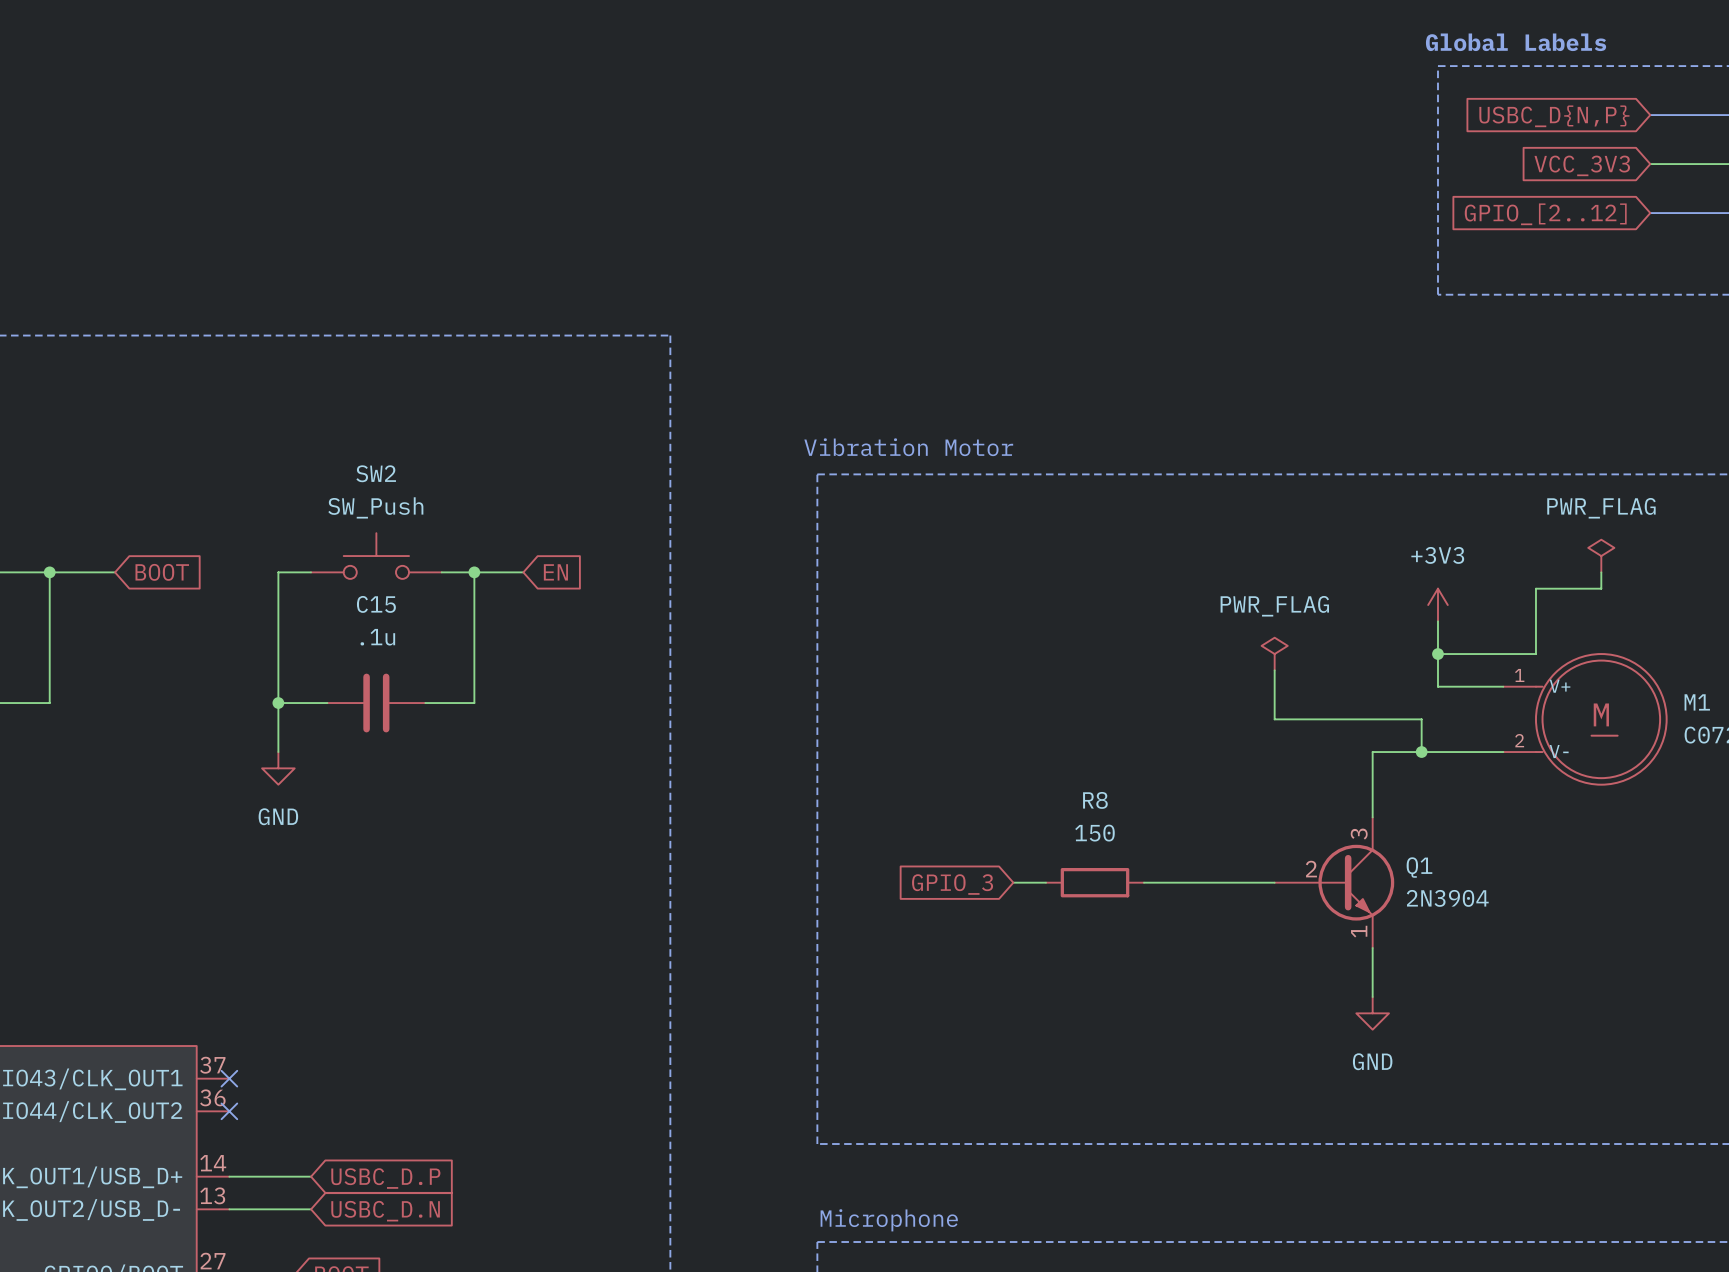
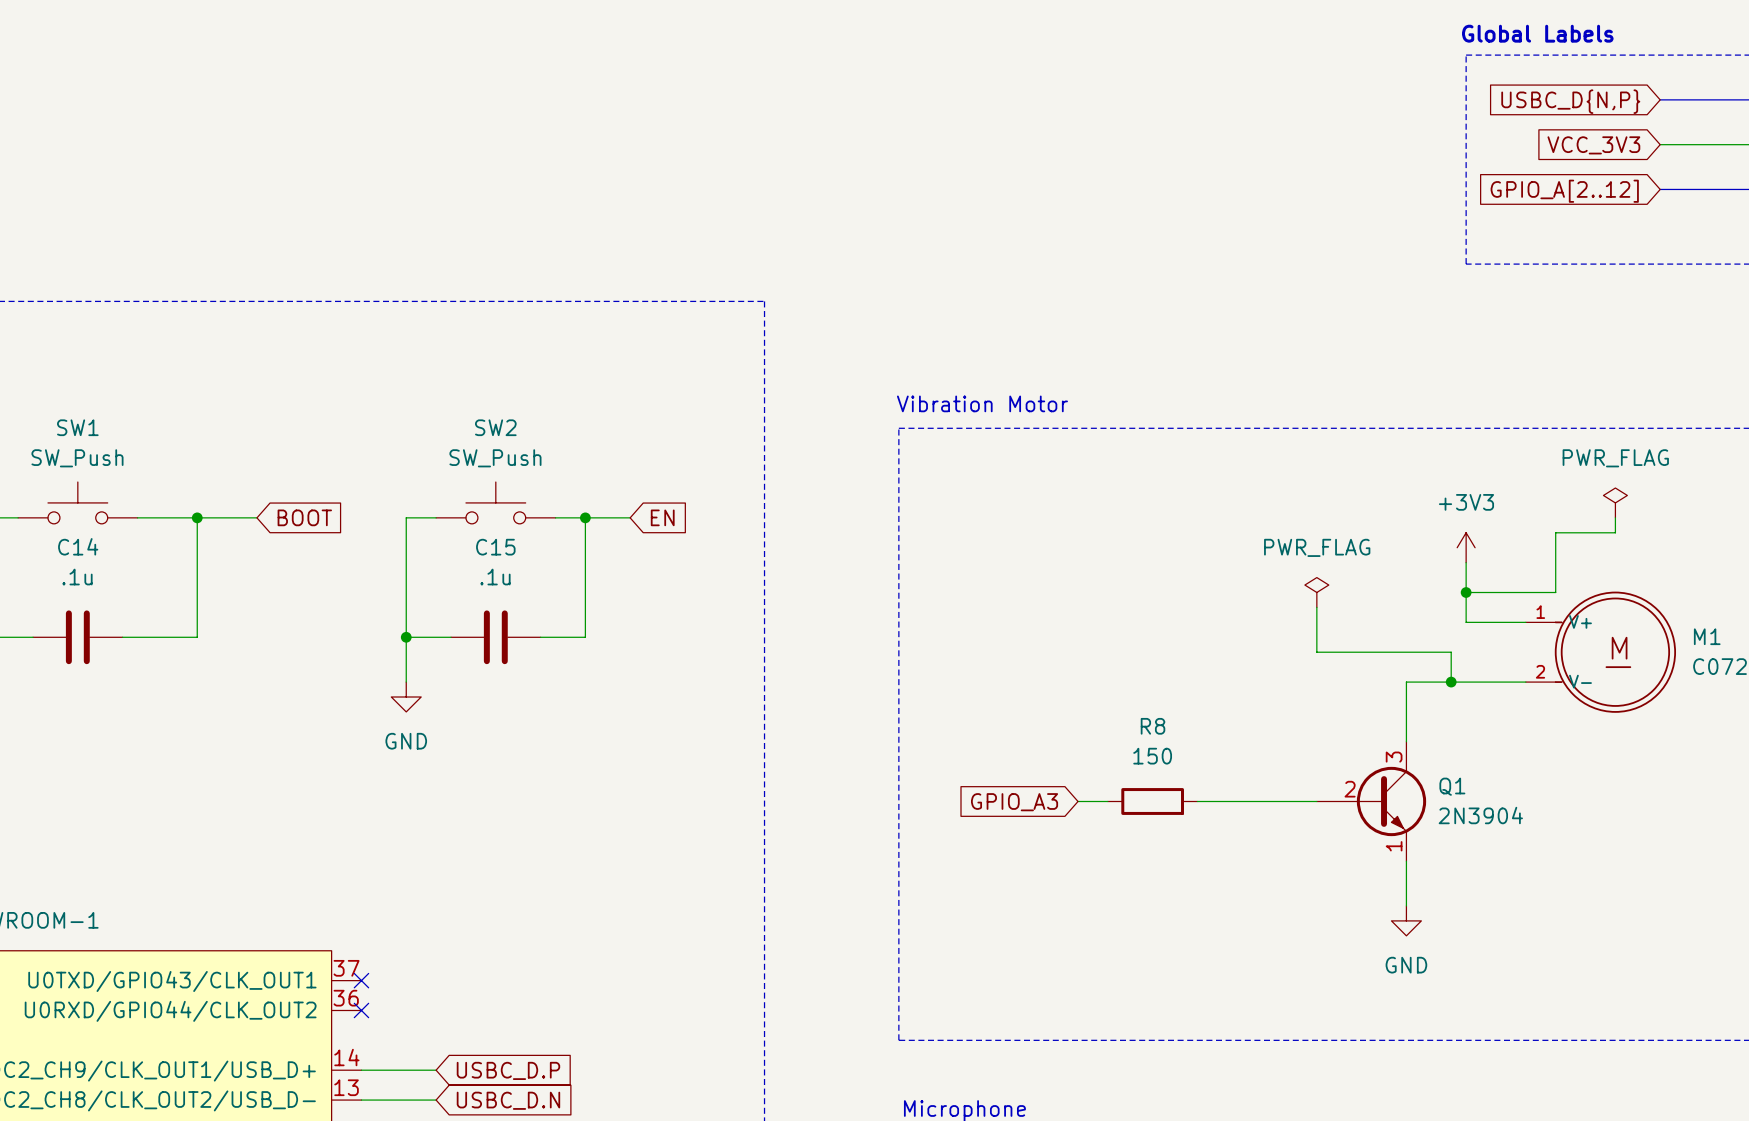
global label: GPIO_[2..12] (1545, 214) -> GPIO_A[2..12] (1564, 191)
global label: GPIO_3 (952, 884) -> GPIO_A3 (1014, 802)

